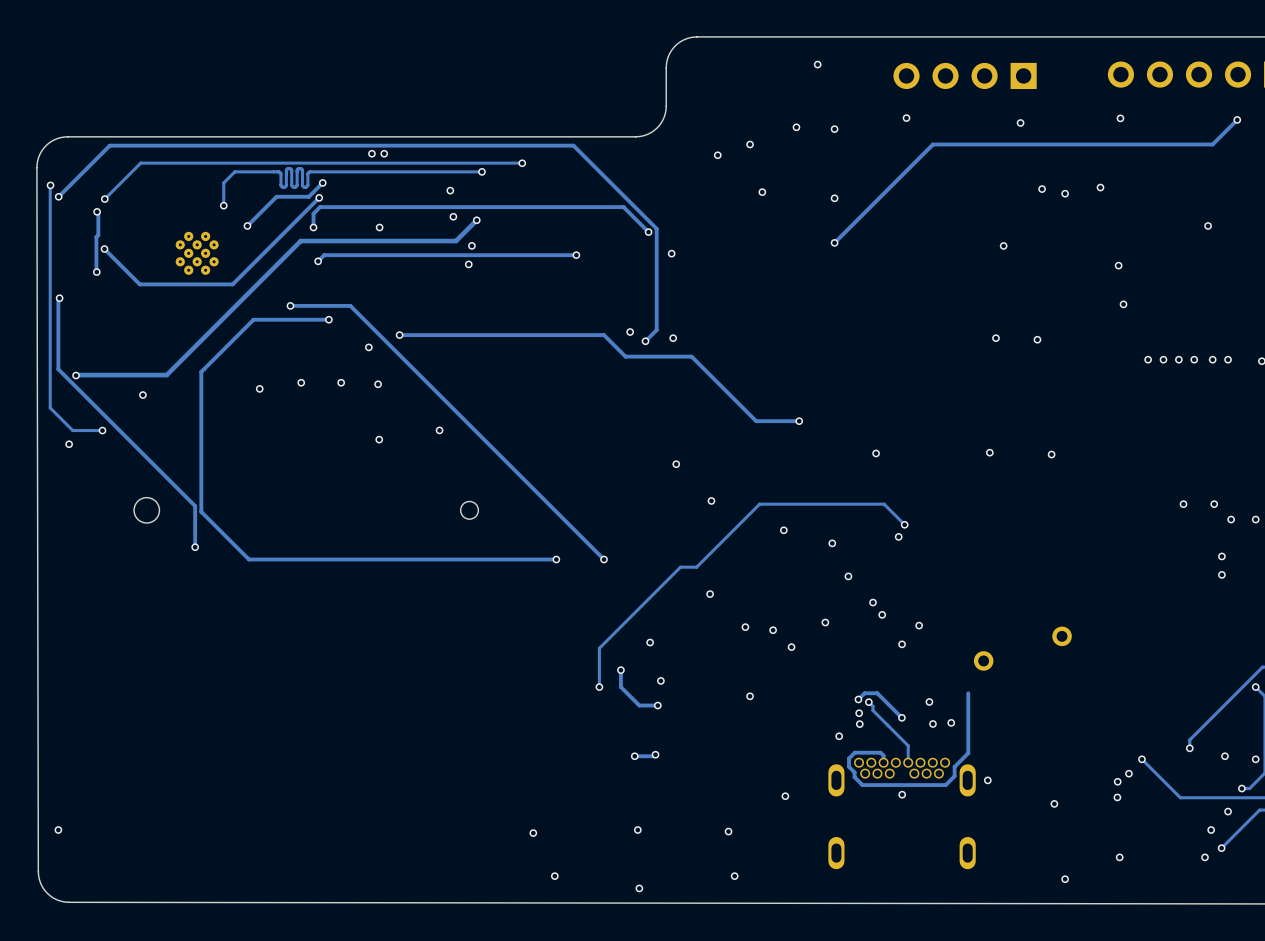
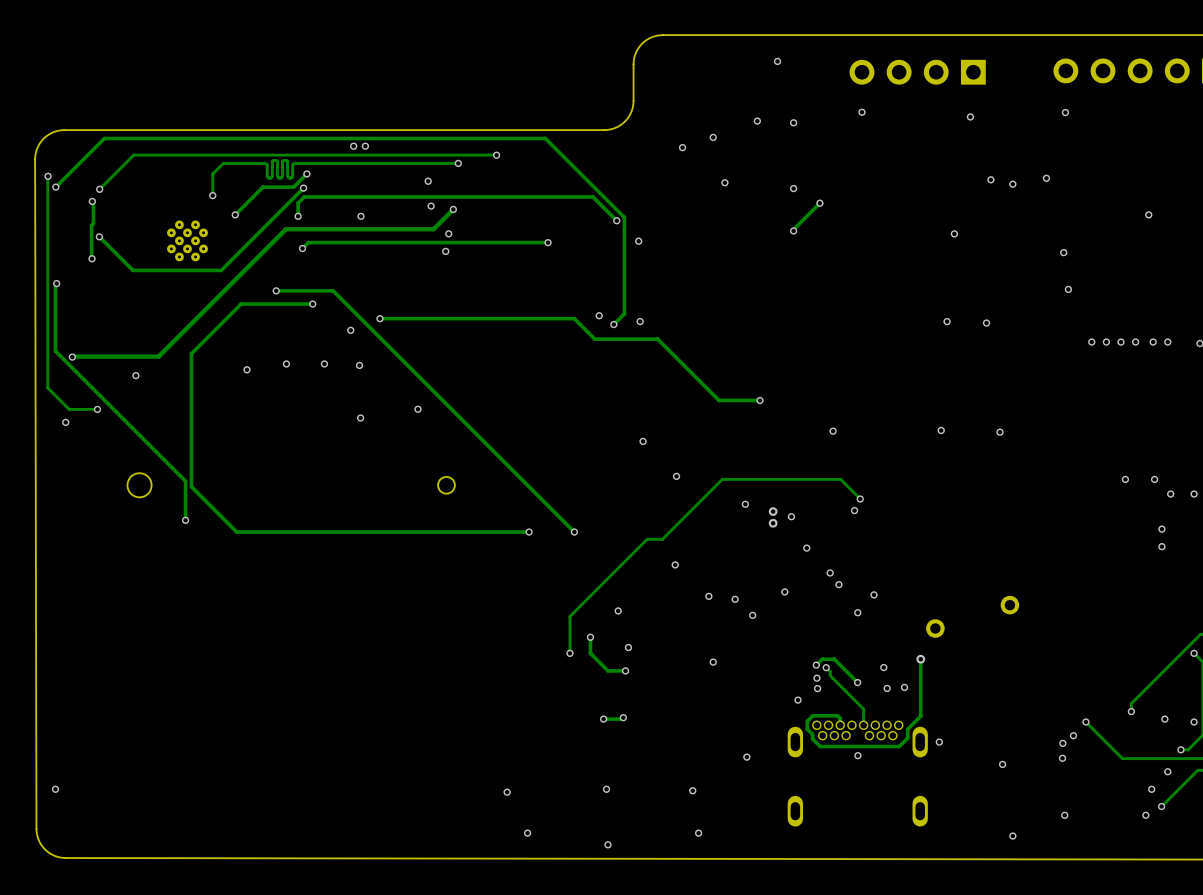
track: (1237, 119) (1212, 144) (932, 144) (834, 242) -> (819, 203) (793, 230)
via: (1237, 119) -> none
via: none -> (819, 203)
via: none -> (773, 511)
via: none -> (773, 523)
via: none -> (920, 659)

